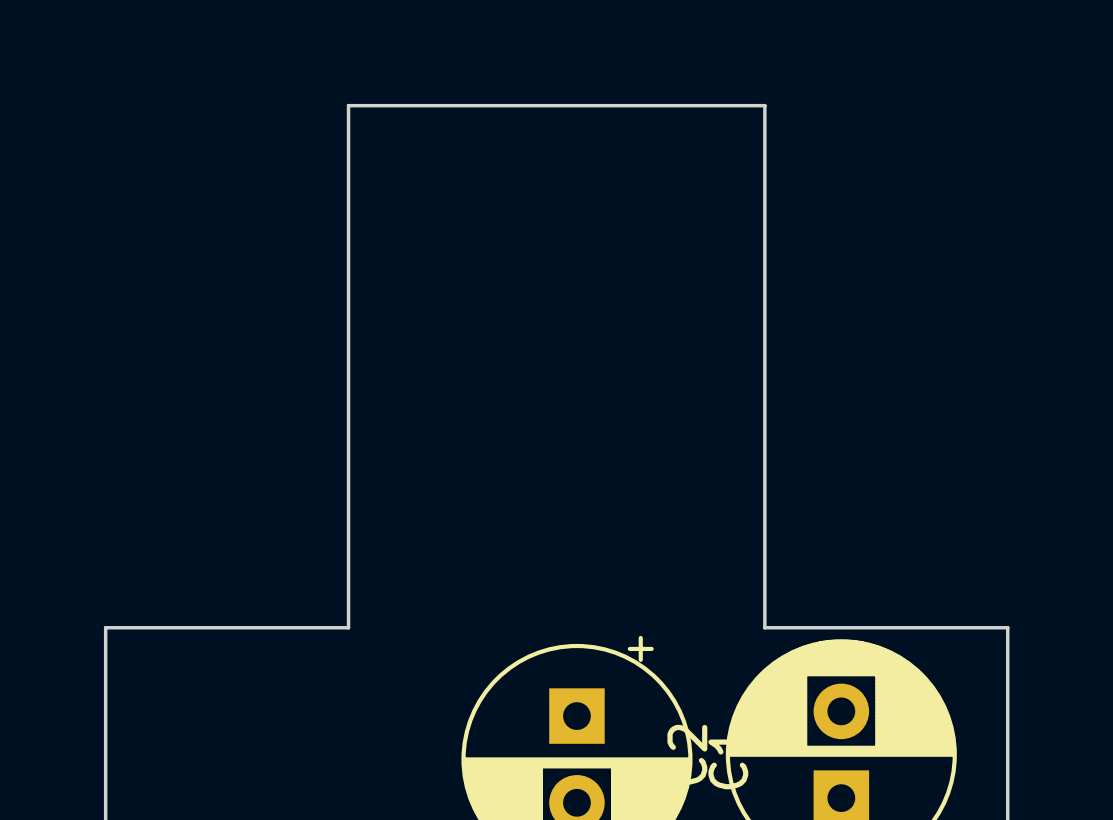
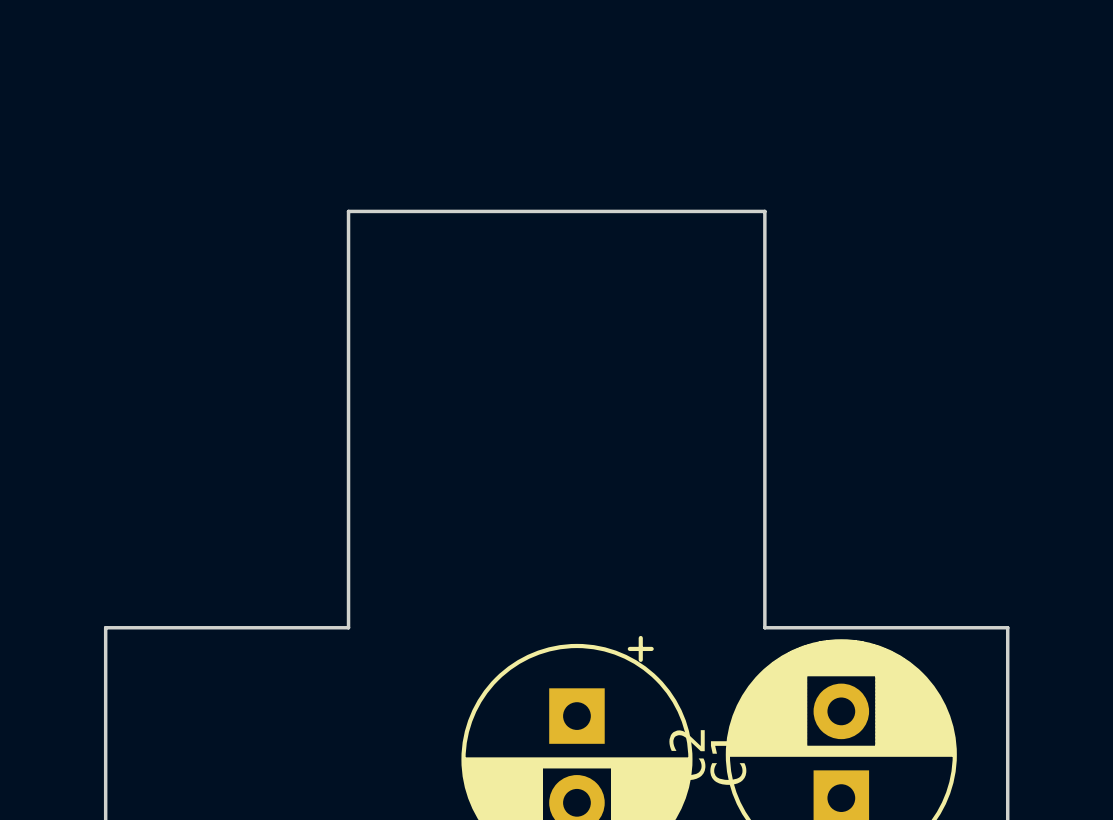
board edge: (348, 211) (348, 105) (764, 105) (764, 211) -> (348, 211) (764, 211)

